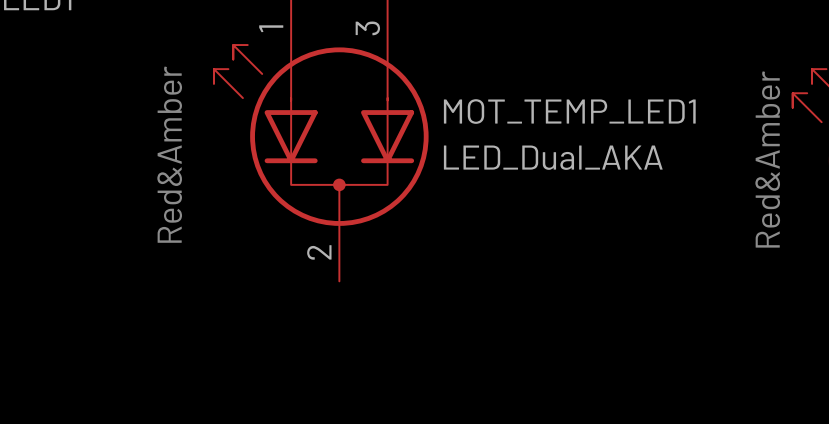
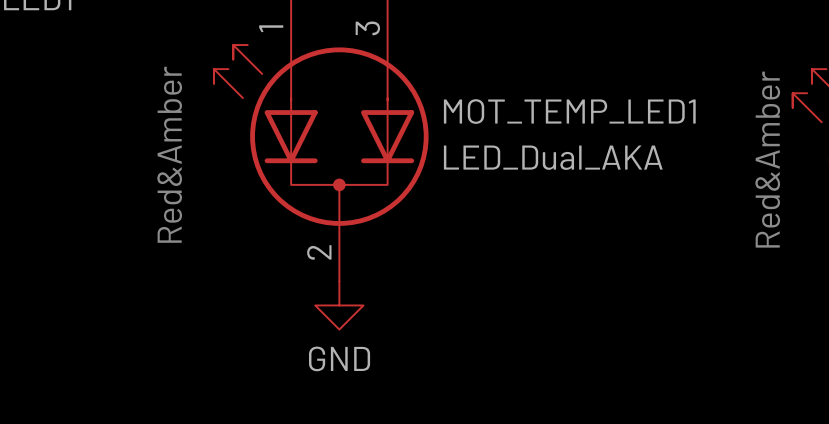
power symbol: none -> GND (339, 305)

